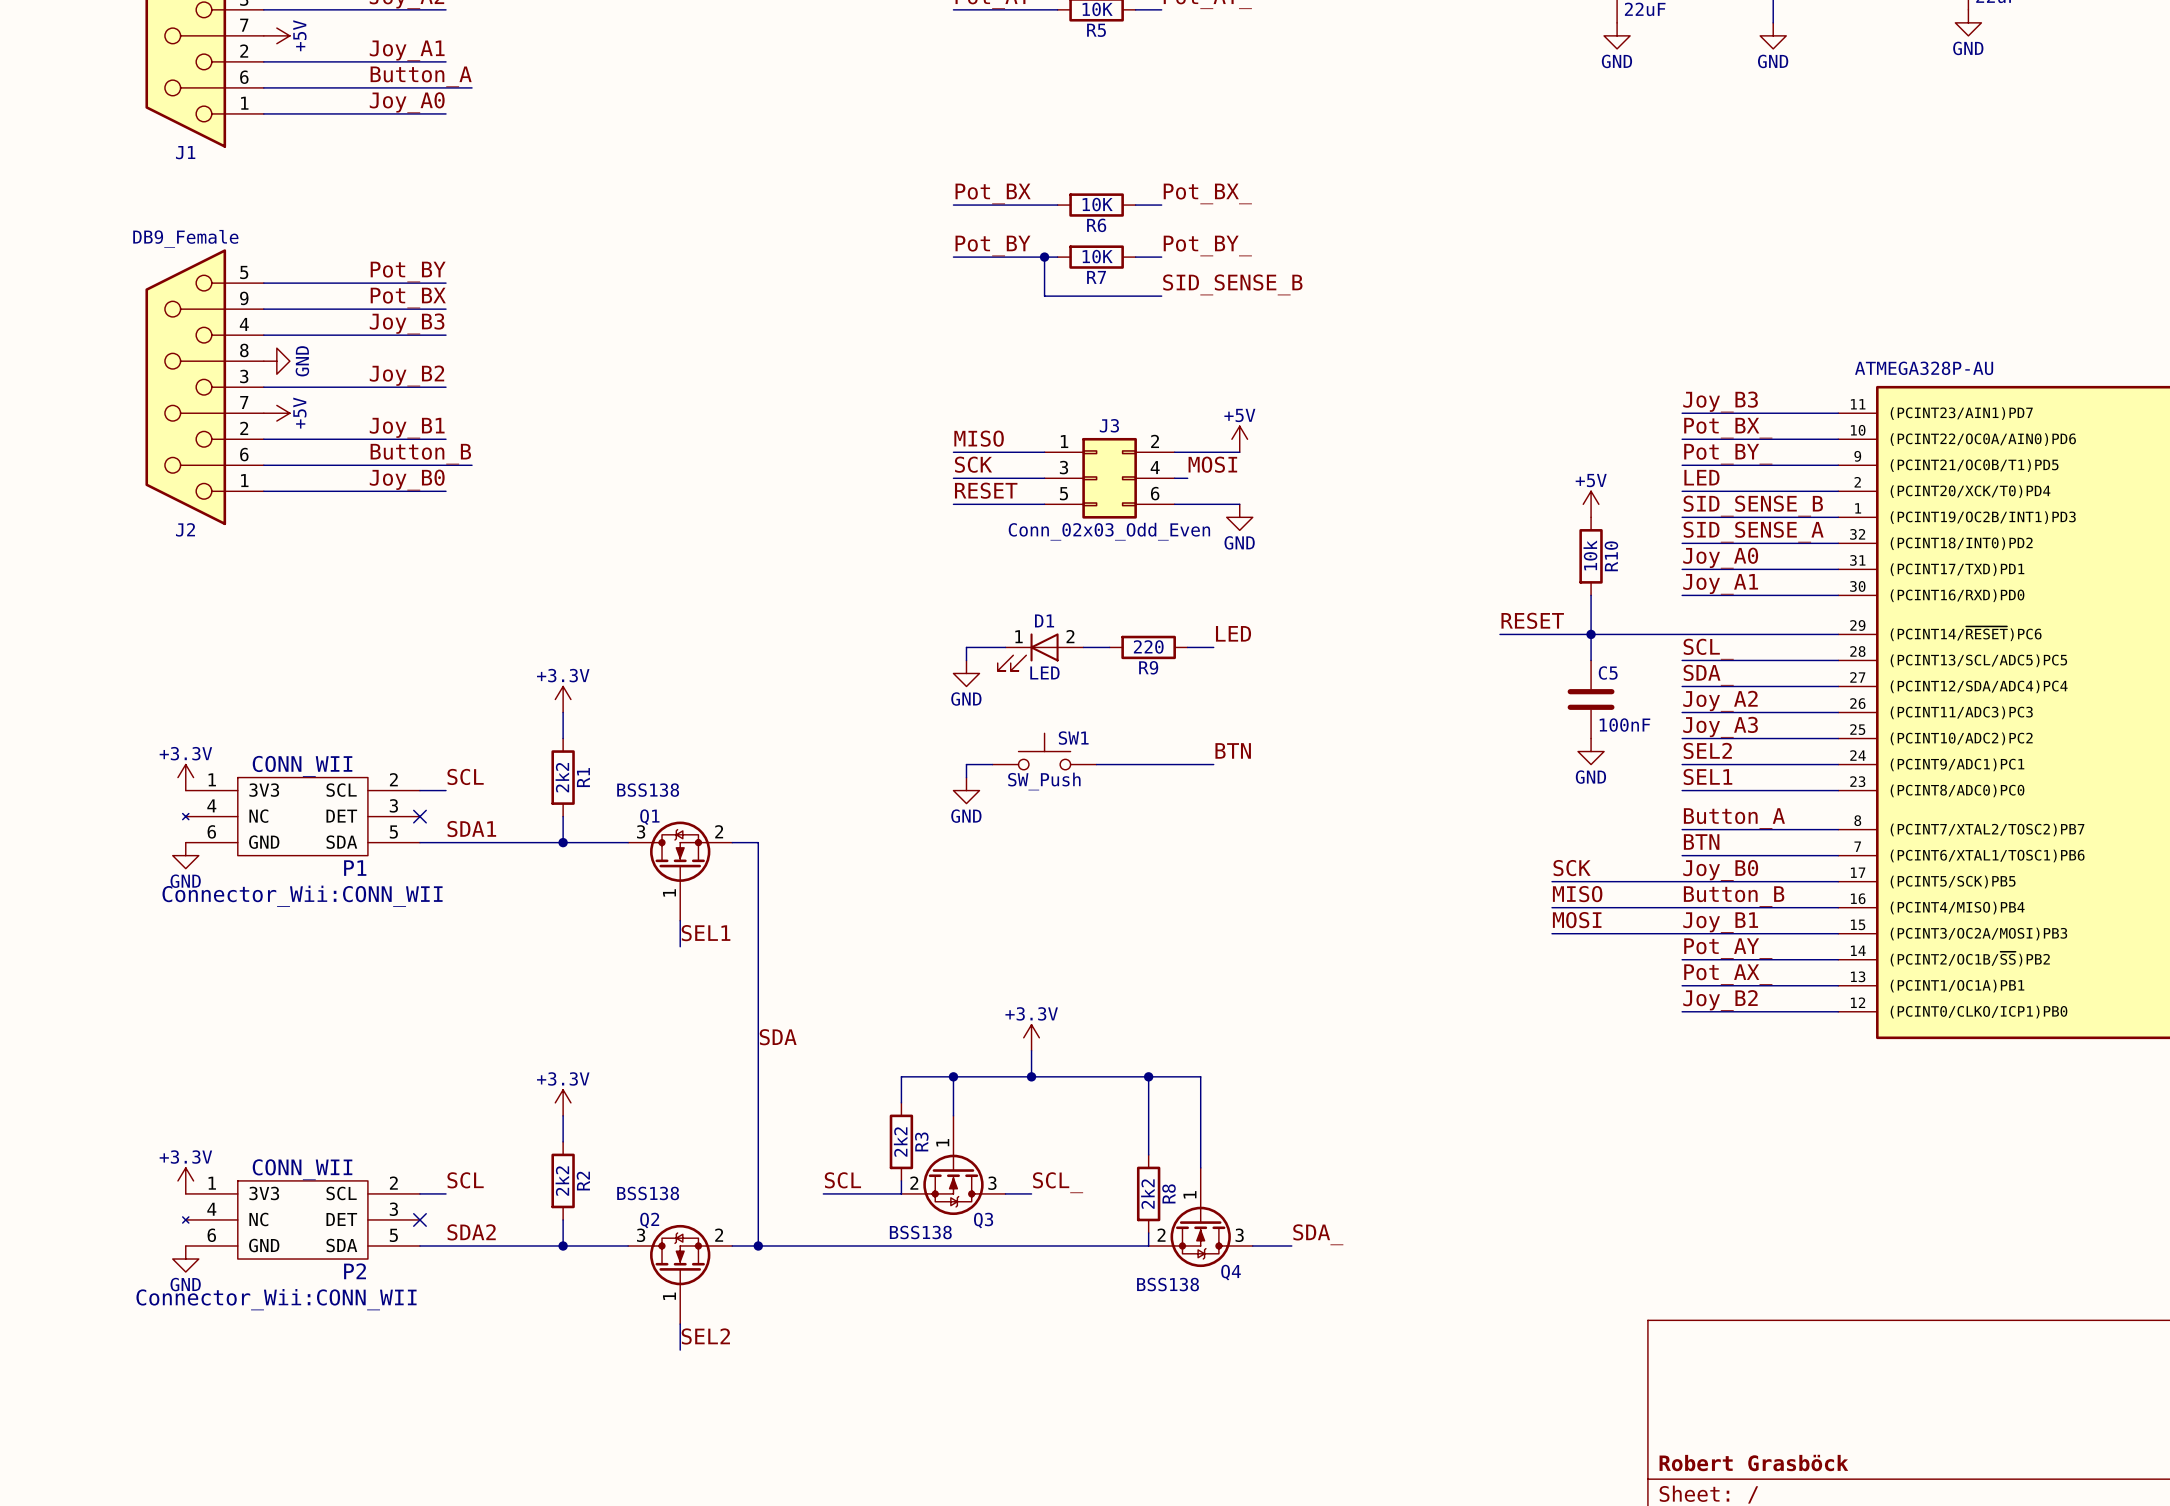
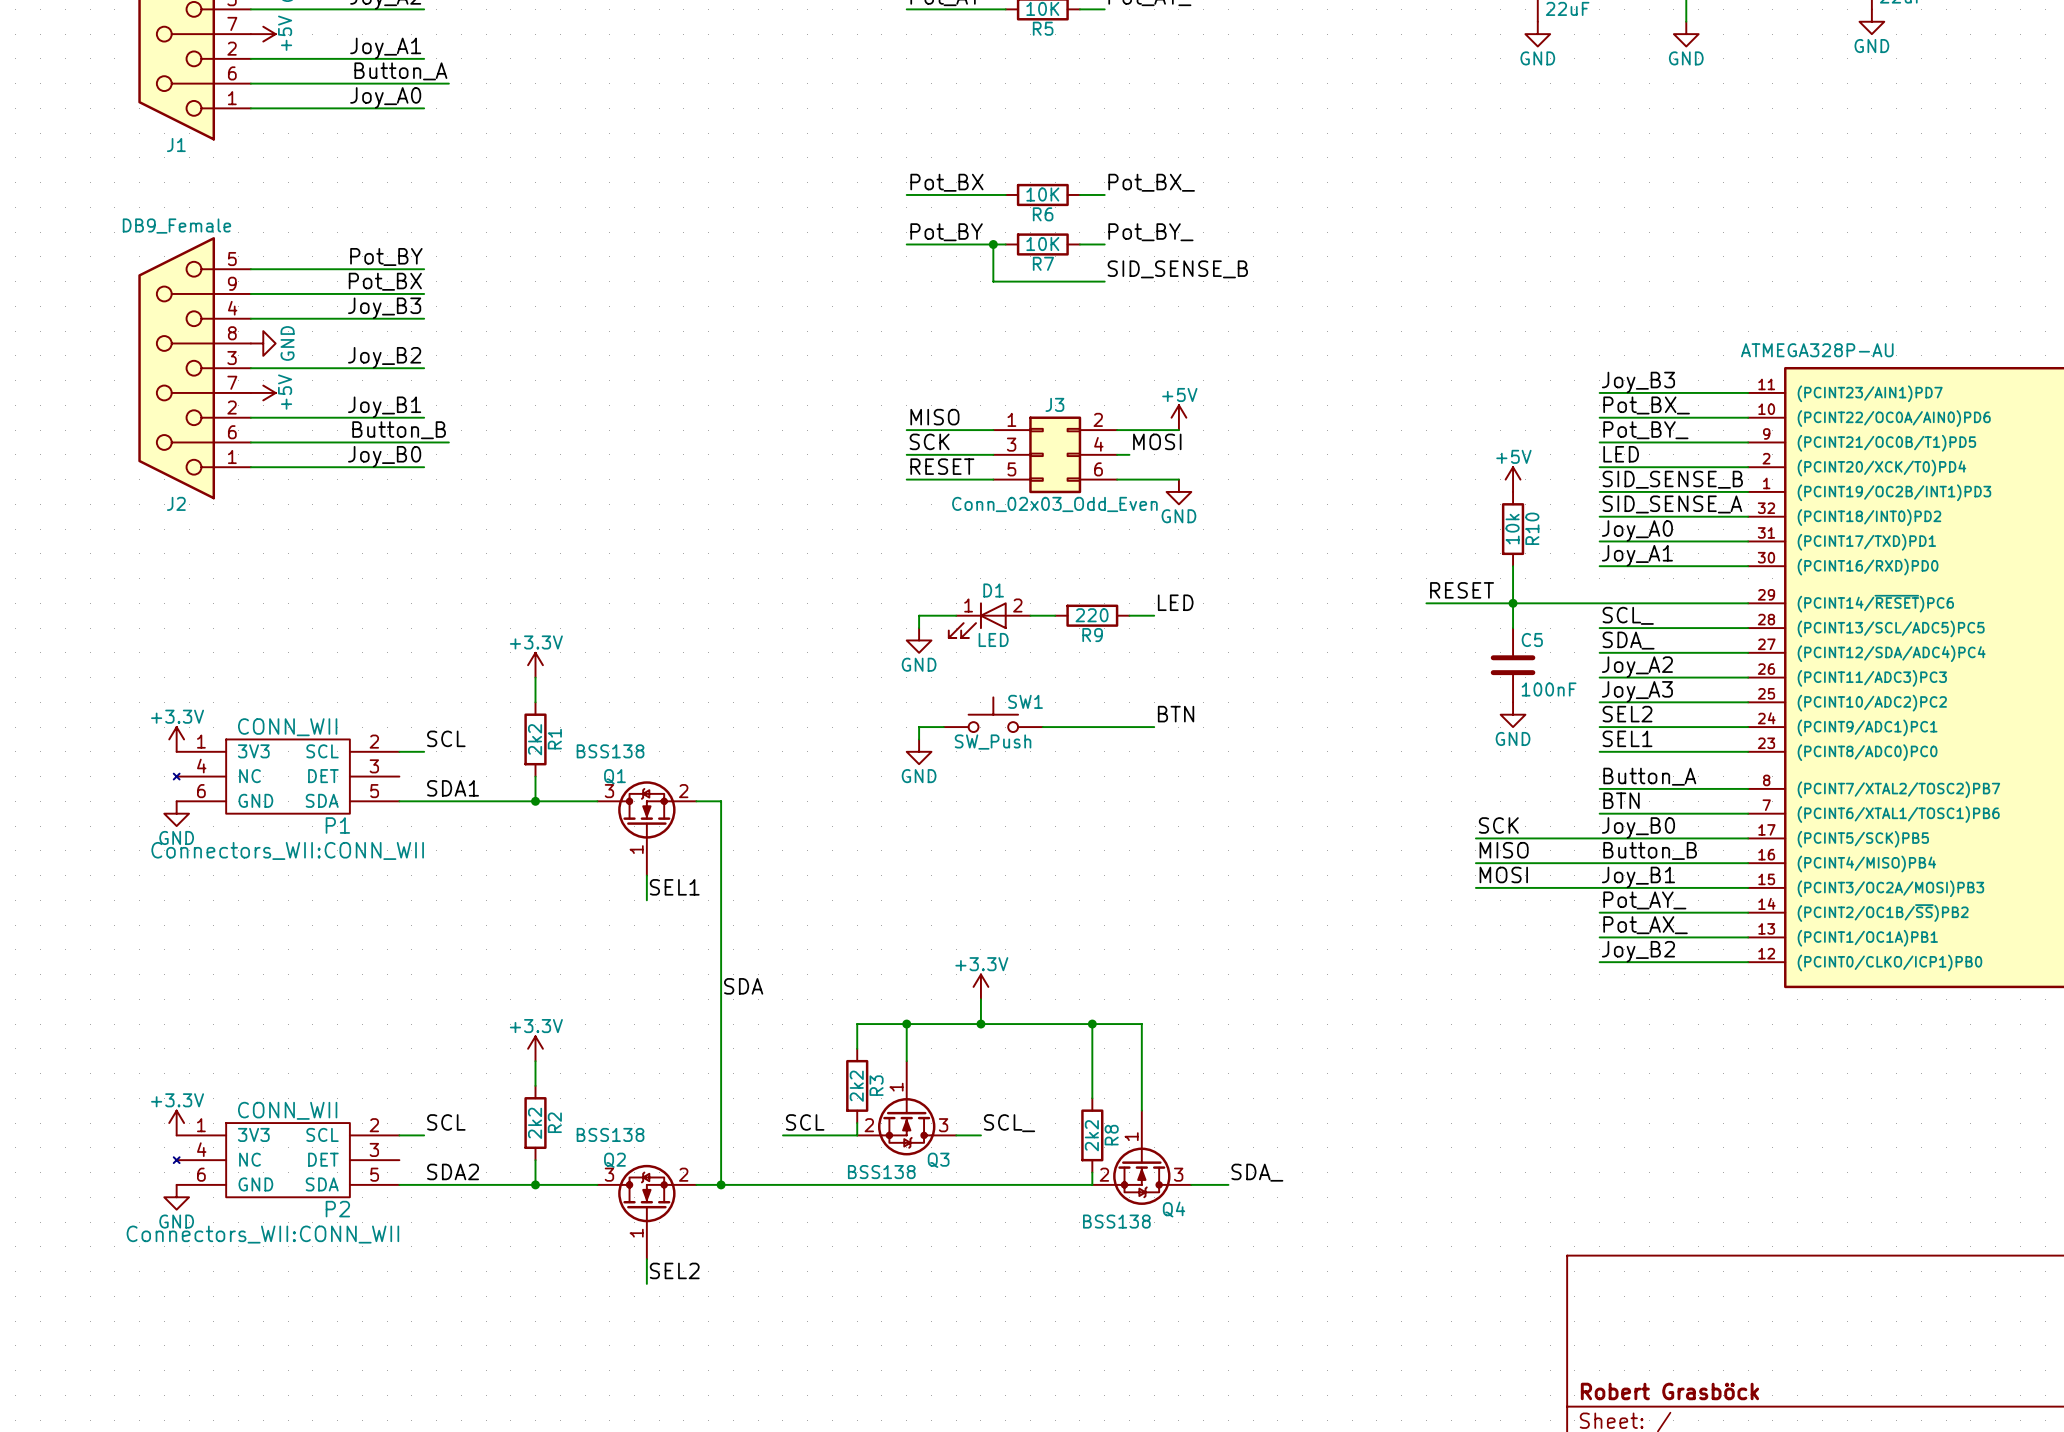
no-connect mark: (419, 816) -> none
P1 text: Connector_Wii:CONN_WII (302, 896) -> Connectors_WII:CONN_WII (287, 850)
no-connect mark: (419, 1219) -> none
P2 text: Connector_Wii:CONN_WII (276, 1299) -> Connectors_WII:CONN_WII (262, 1234)

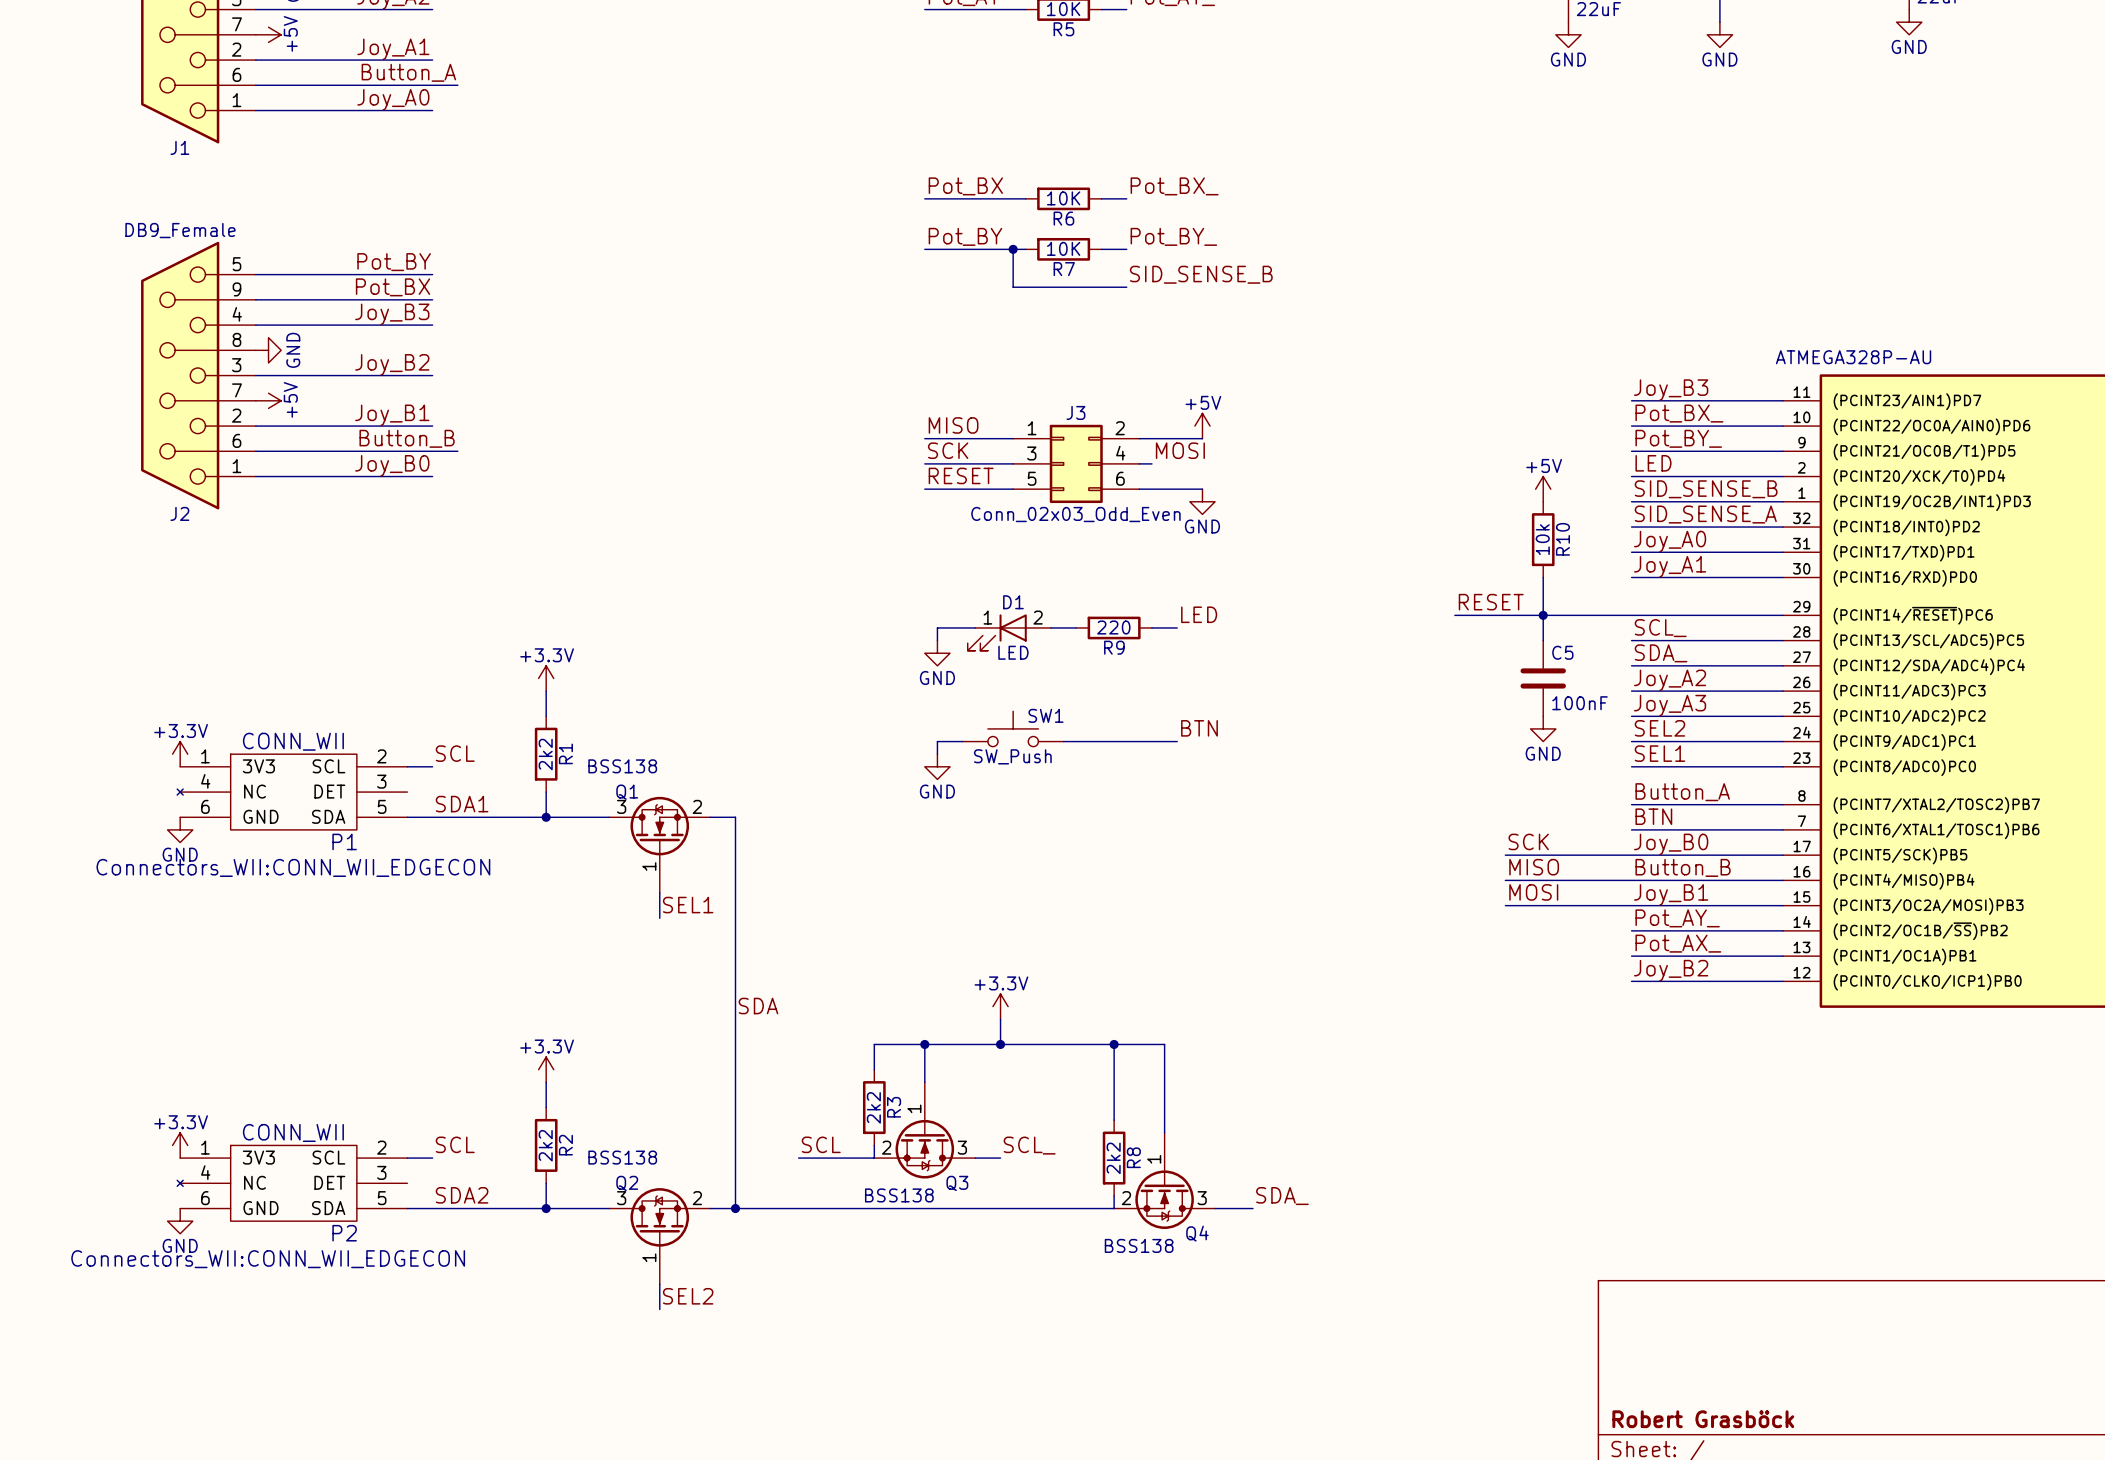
P1 text: Connectors_WII:CONN_WII (287, 850) -> Connectors_WII:CONN_WII_EDGECON (293, 867)
P2 text: Connectors_WII:CONN_WII (262, 1234) -> Connectors_WII:CONN_WII_EDGECON (268, 1259)

